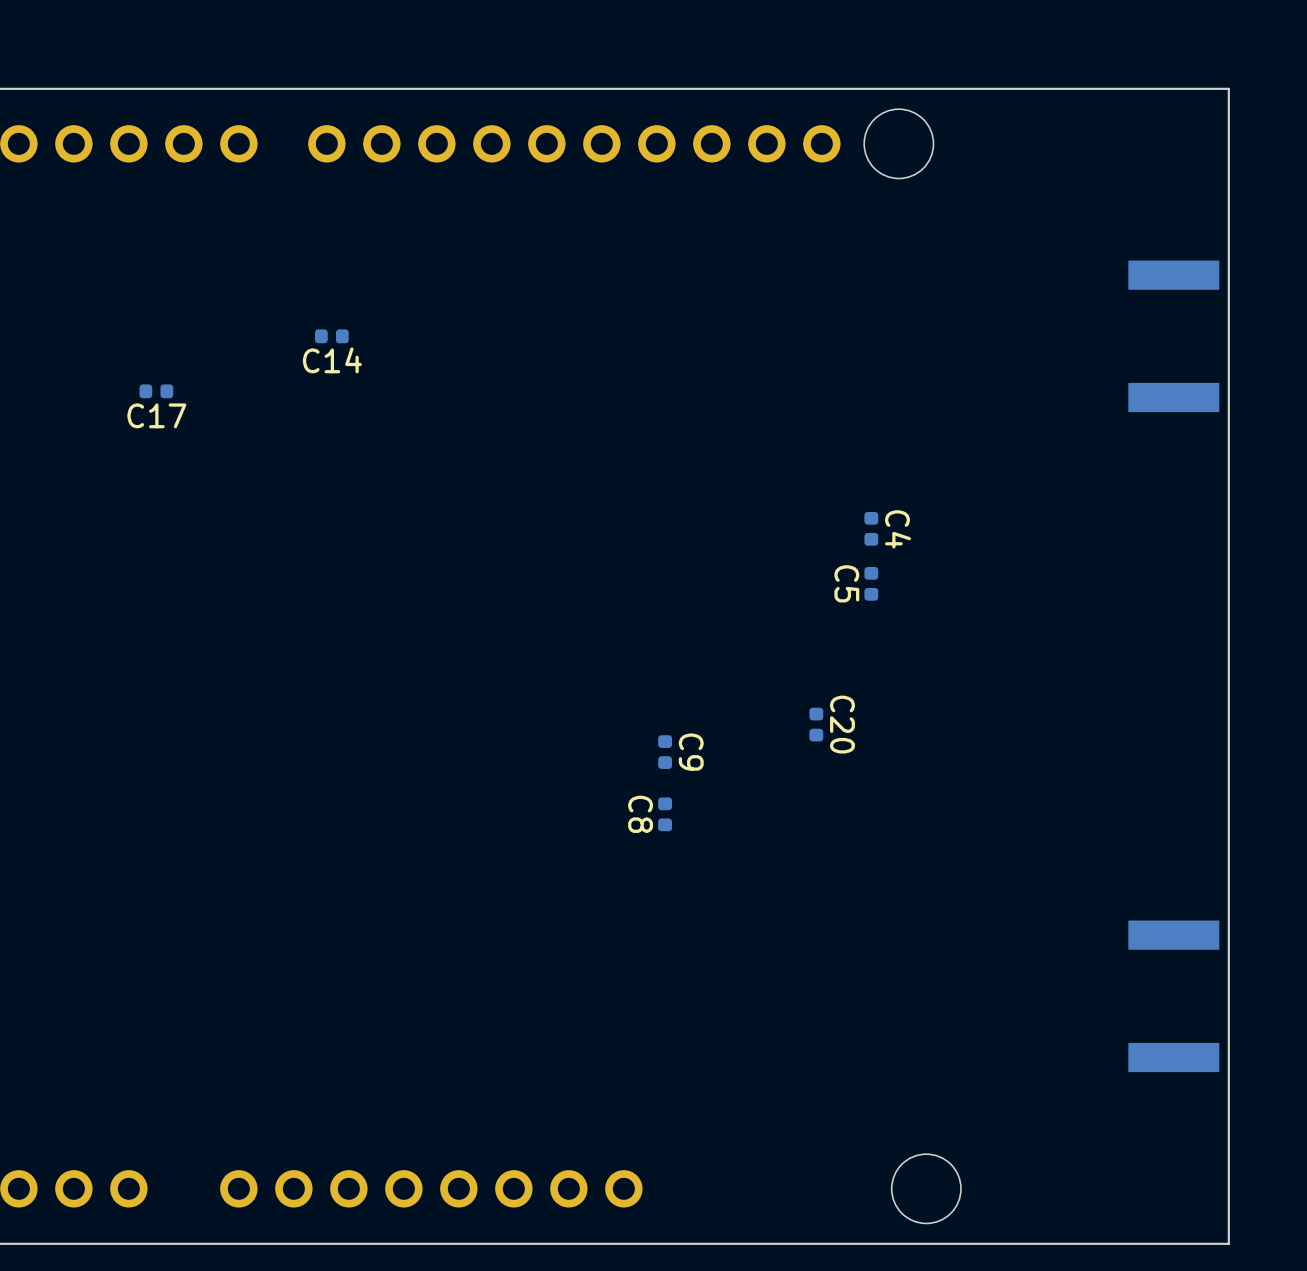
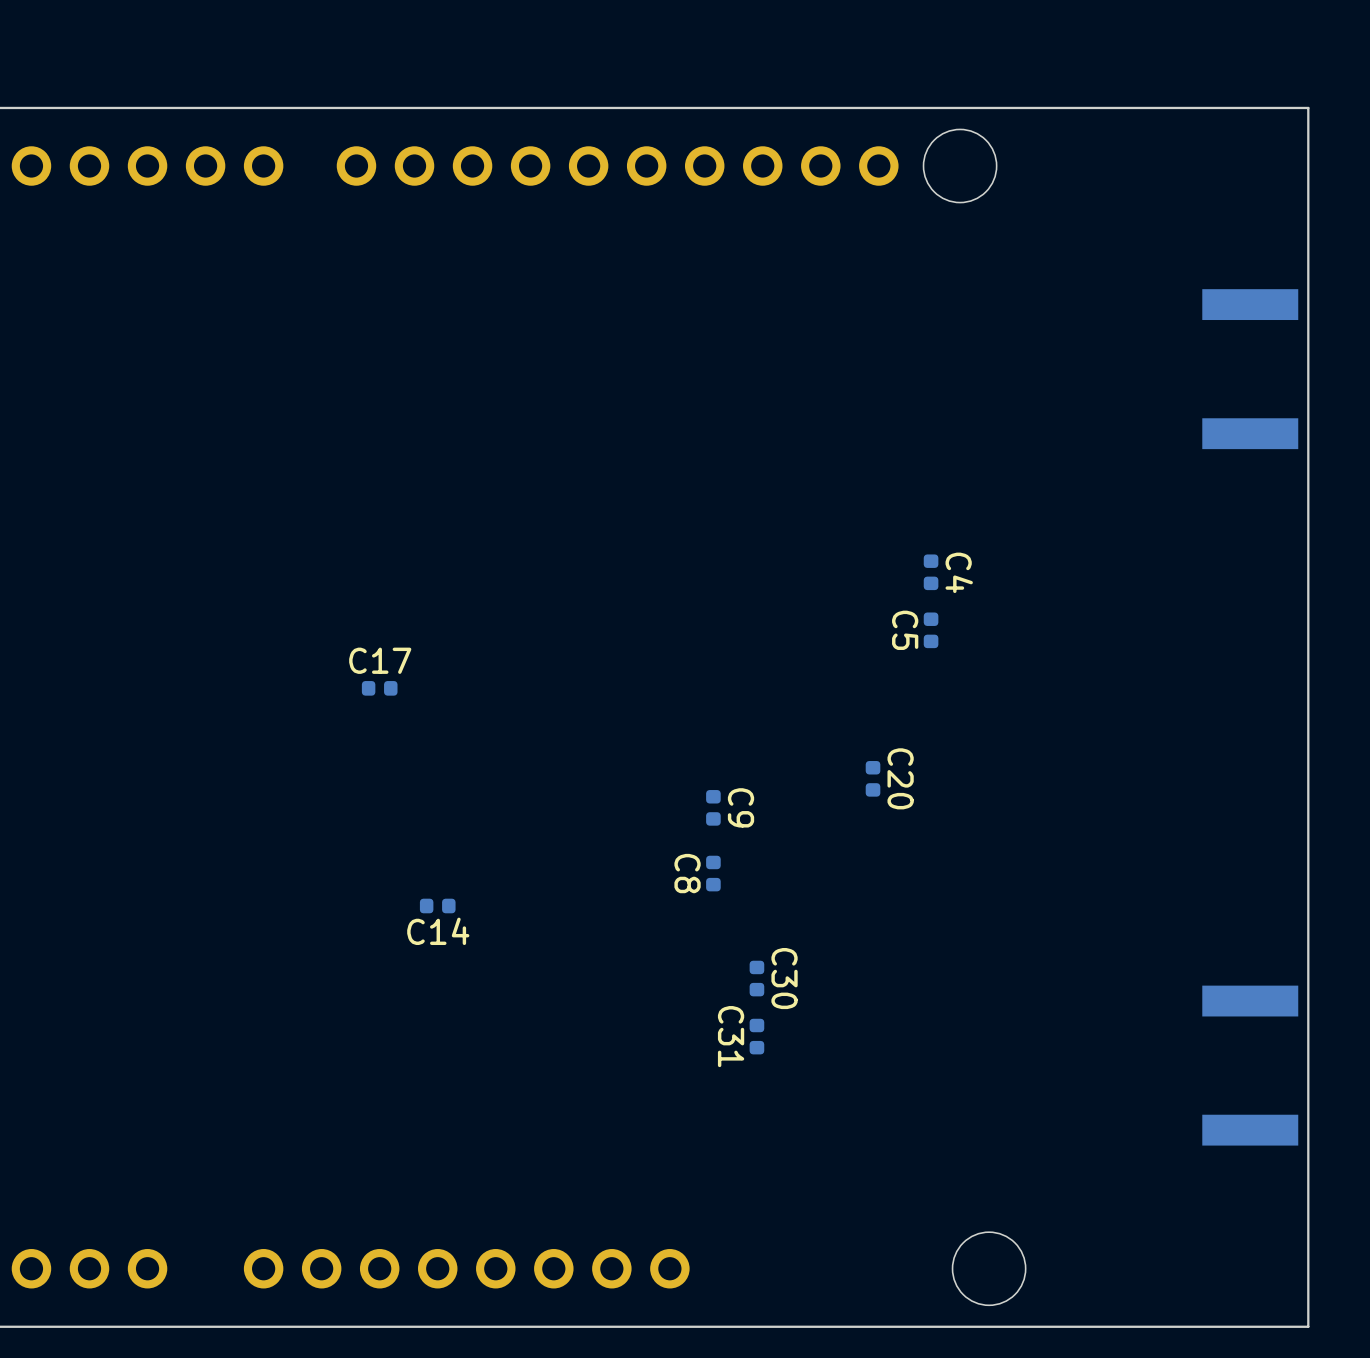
C14 position: (331, 336) -> (437, 905)
C17 position: (156, 391) -> (379, 688)
C17 name position: C17 (156, 415) -> C17 (380, 660)
C30: none -> (756, 978)
C31: none -> (756, 1036)

